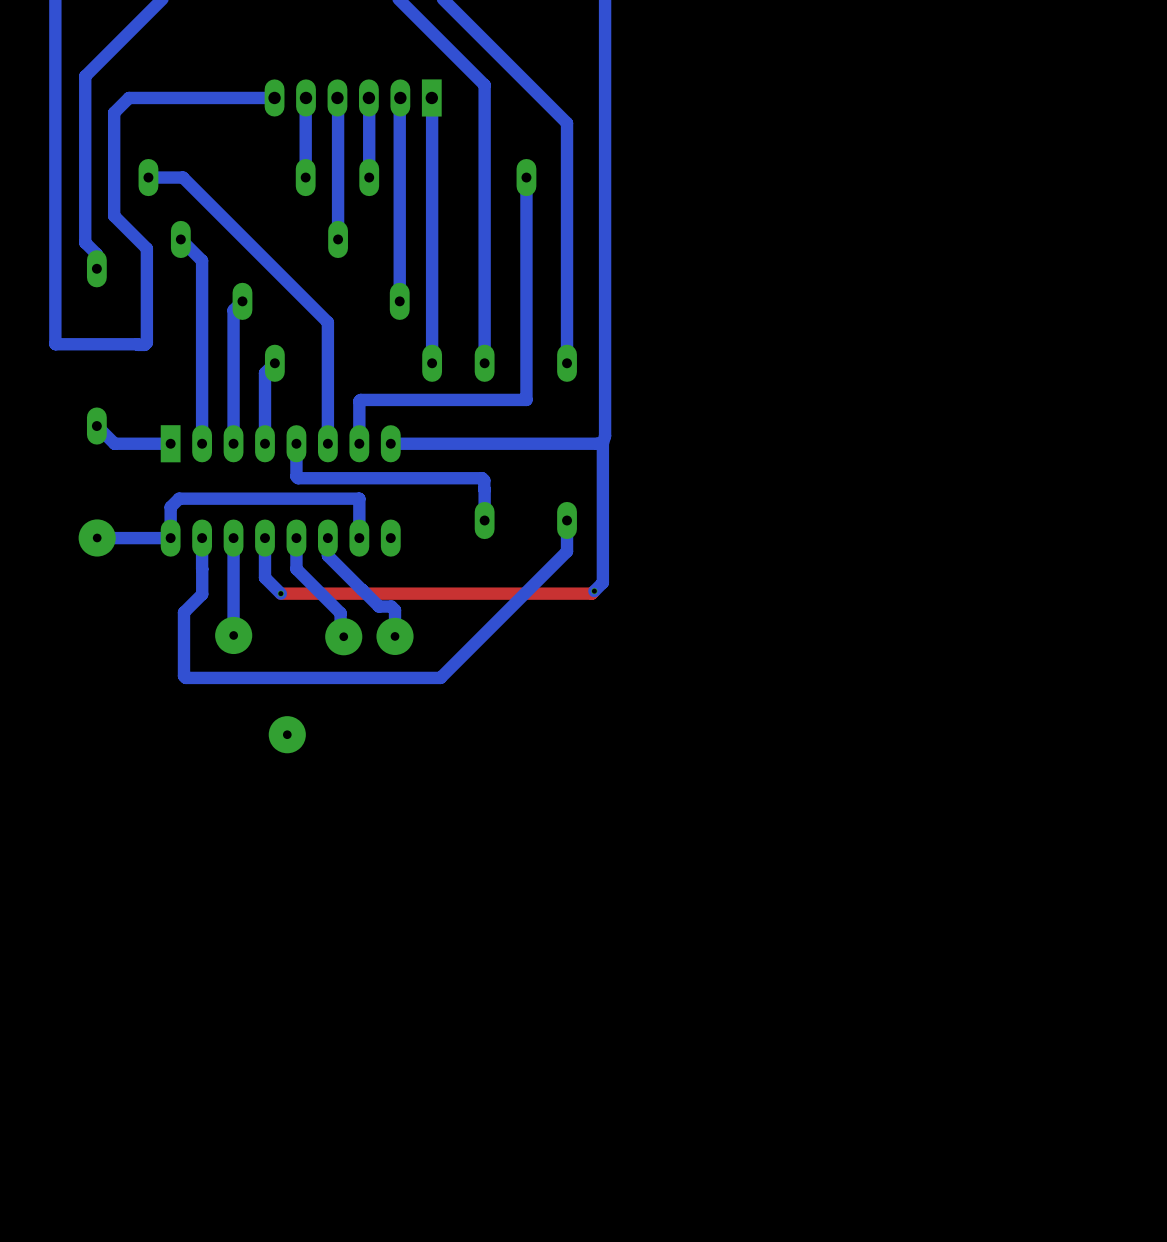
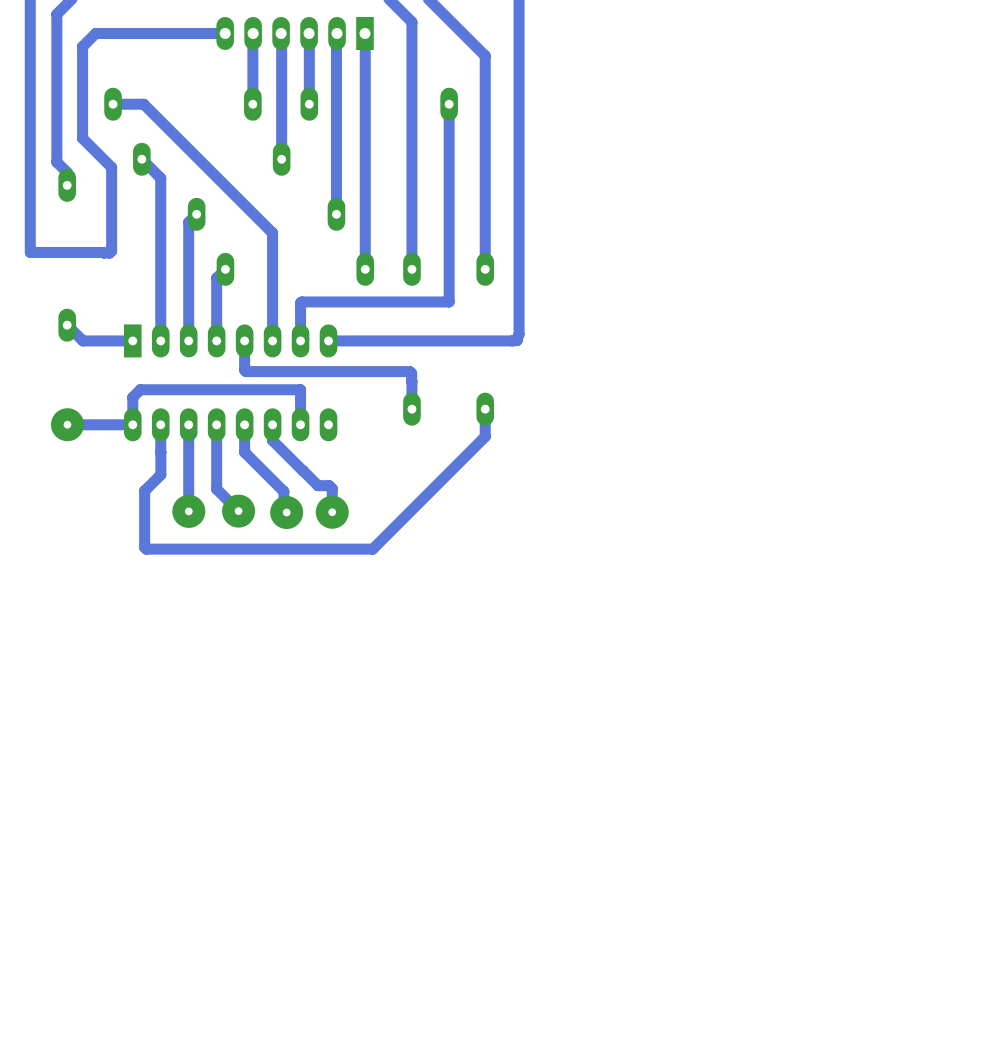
bottom track: (602, 443) (602, 582) (594, 591) -> none
bottom track: (265, 577) (280, 593) -> (216, 460) (216, 489) (238, 511)
top track: (594, 591) (591, 593) (280, 593) -> none
via: (594, 591) -> none
via: (280, 593) -> none
part position: (287, 734) -> (238, 511)

